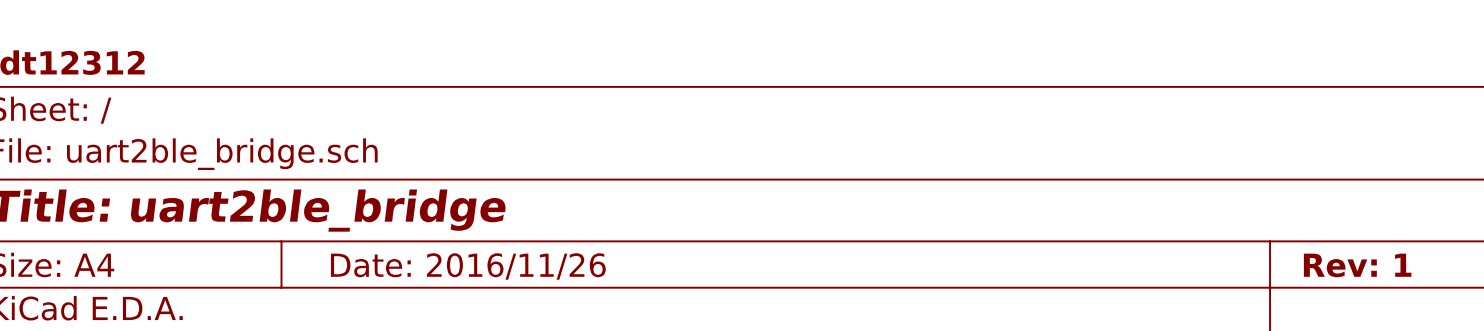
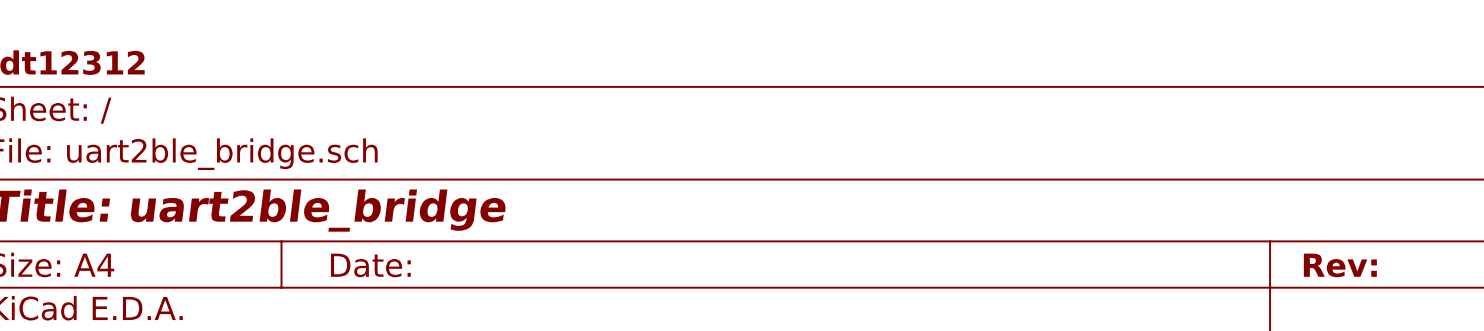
title block: Rev: 1 (1357, 265) -> Rev: (1340, 265)
title block: Date: 2016/11/26 (468, 266) -> Date: (370, 265)

